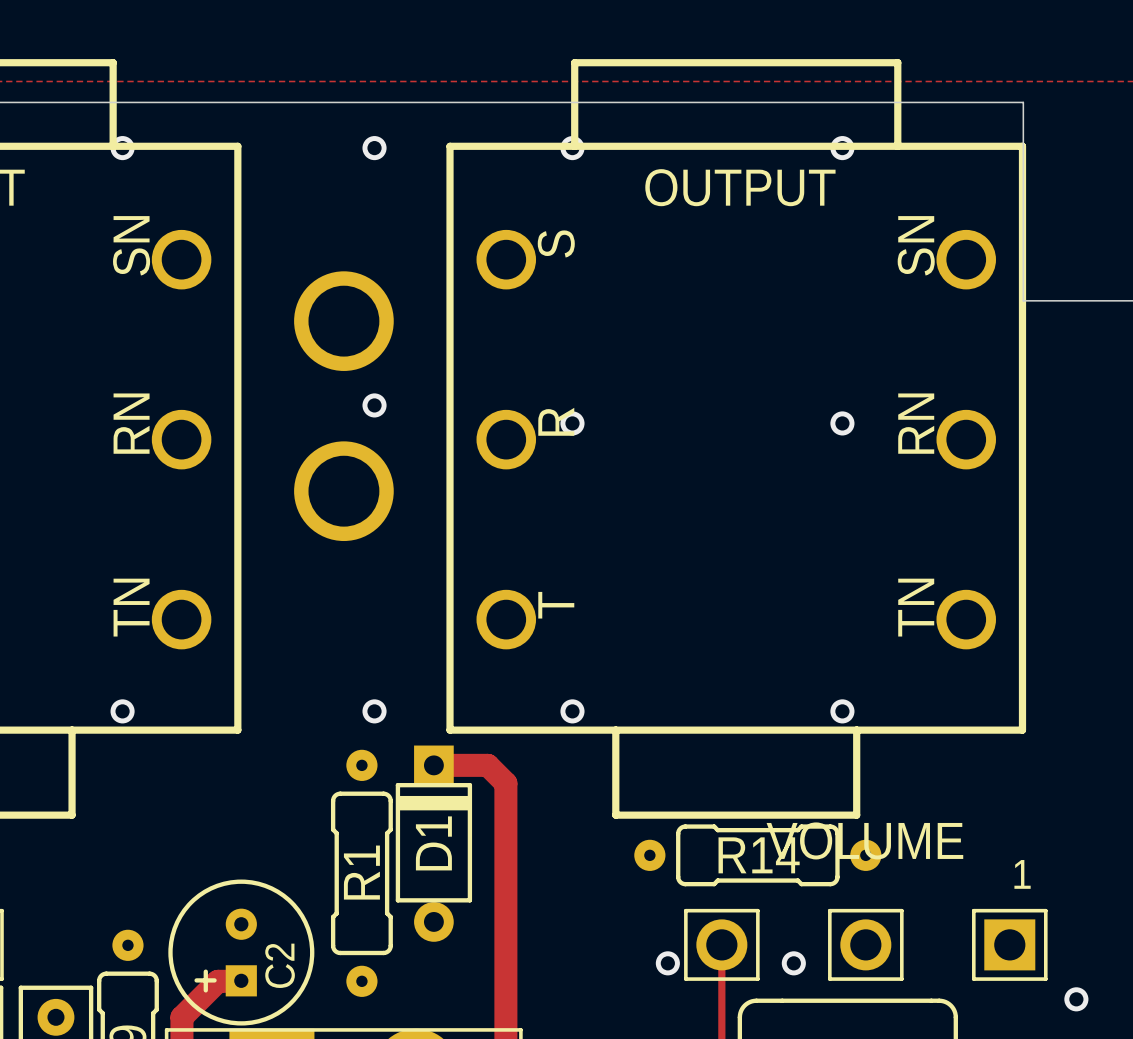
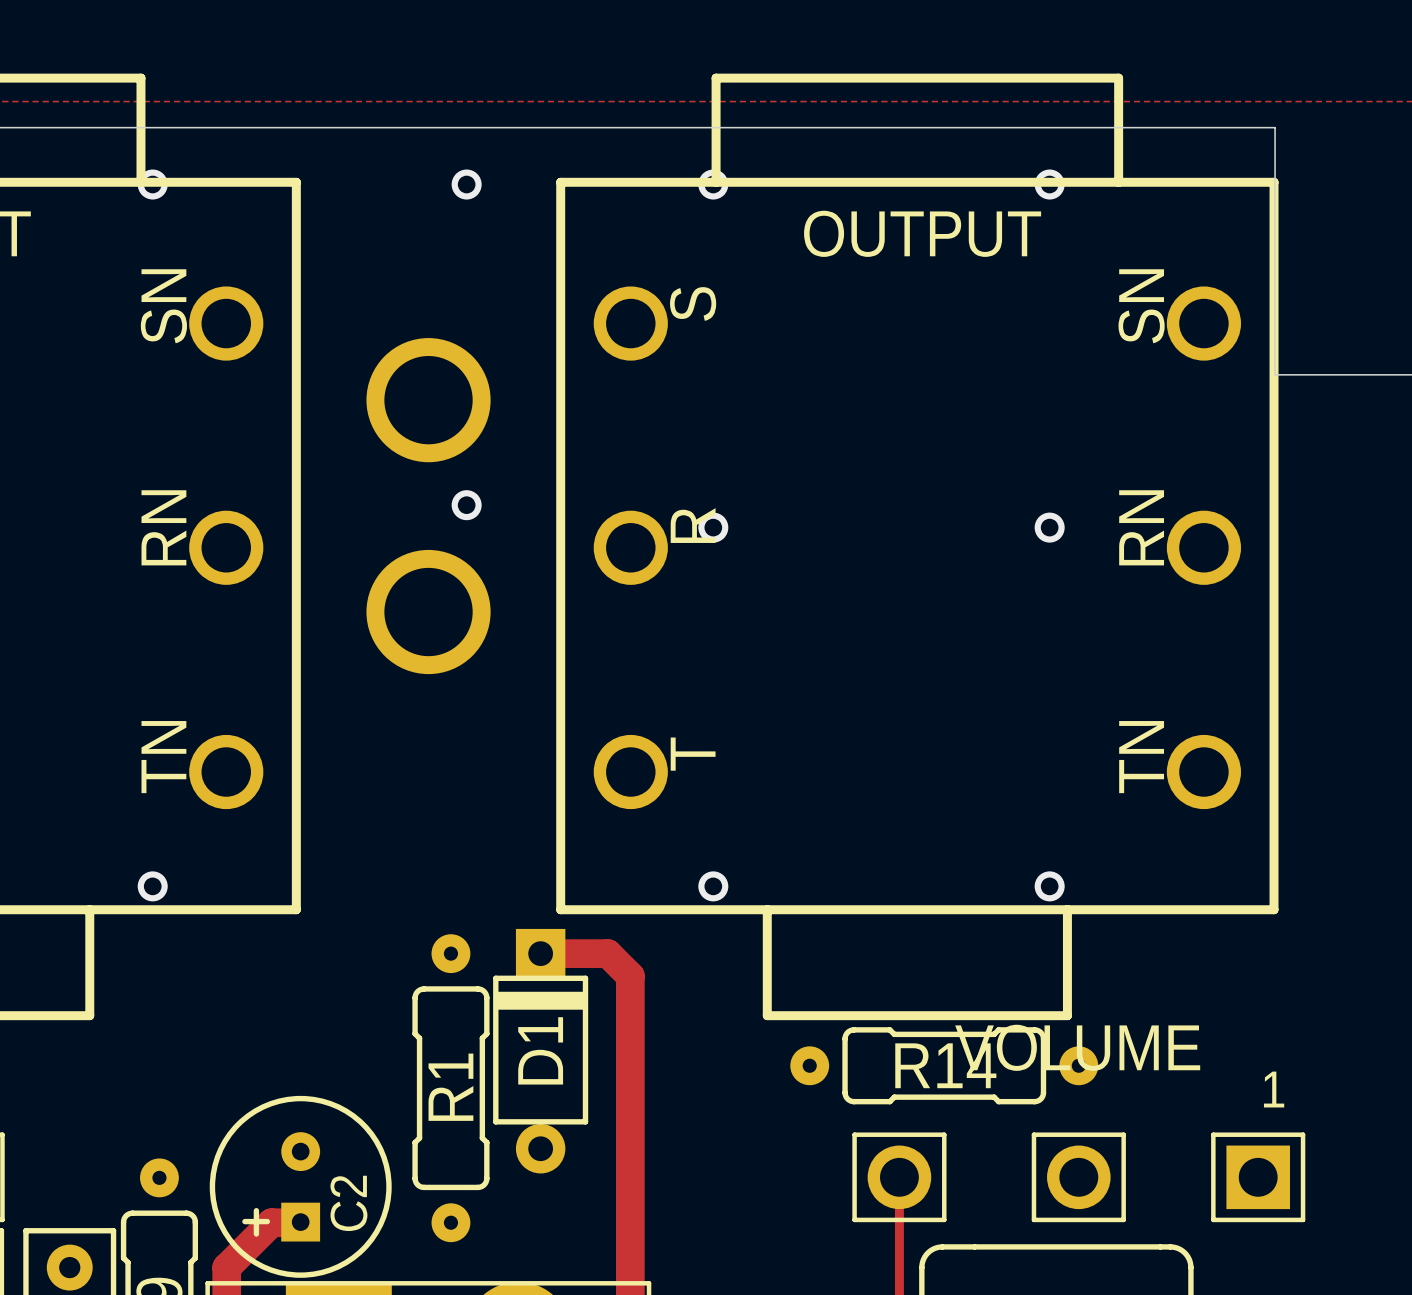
via: (374, 711) -> none
via: (667, 963) -> none
via: (793, 963) -> none
via: (1076, 999) -> none

